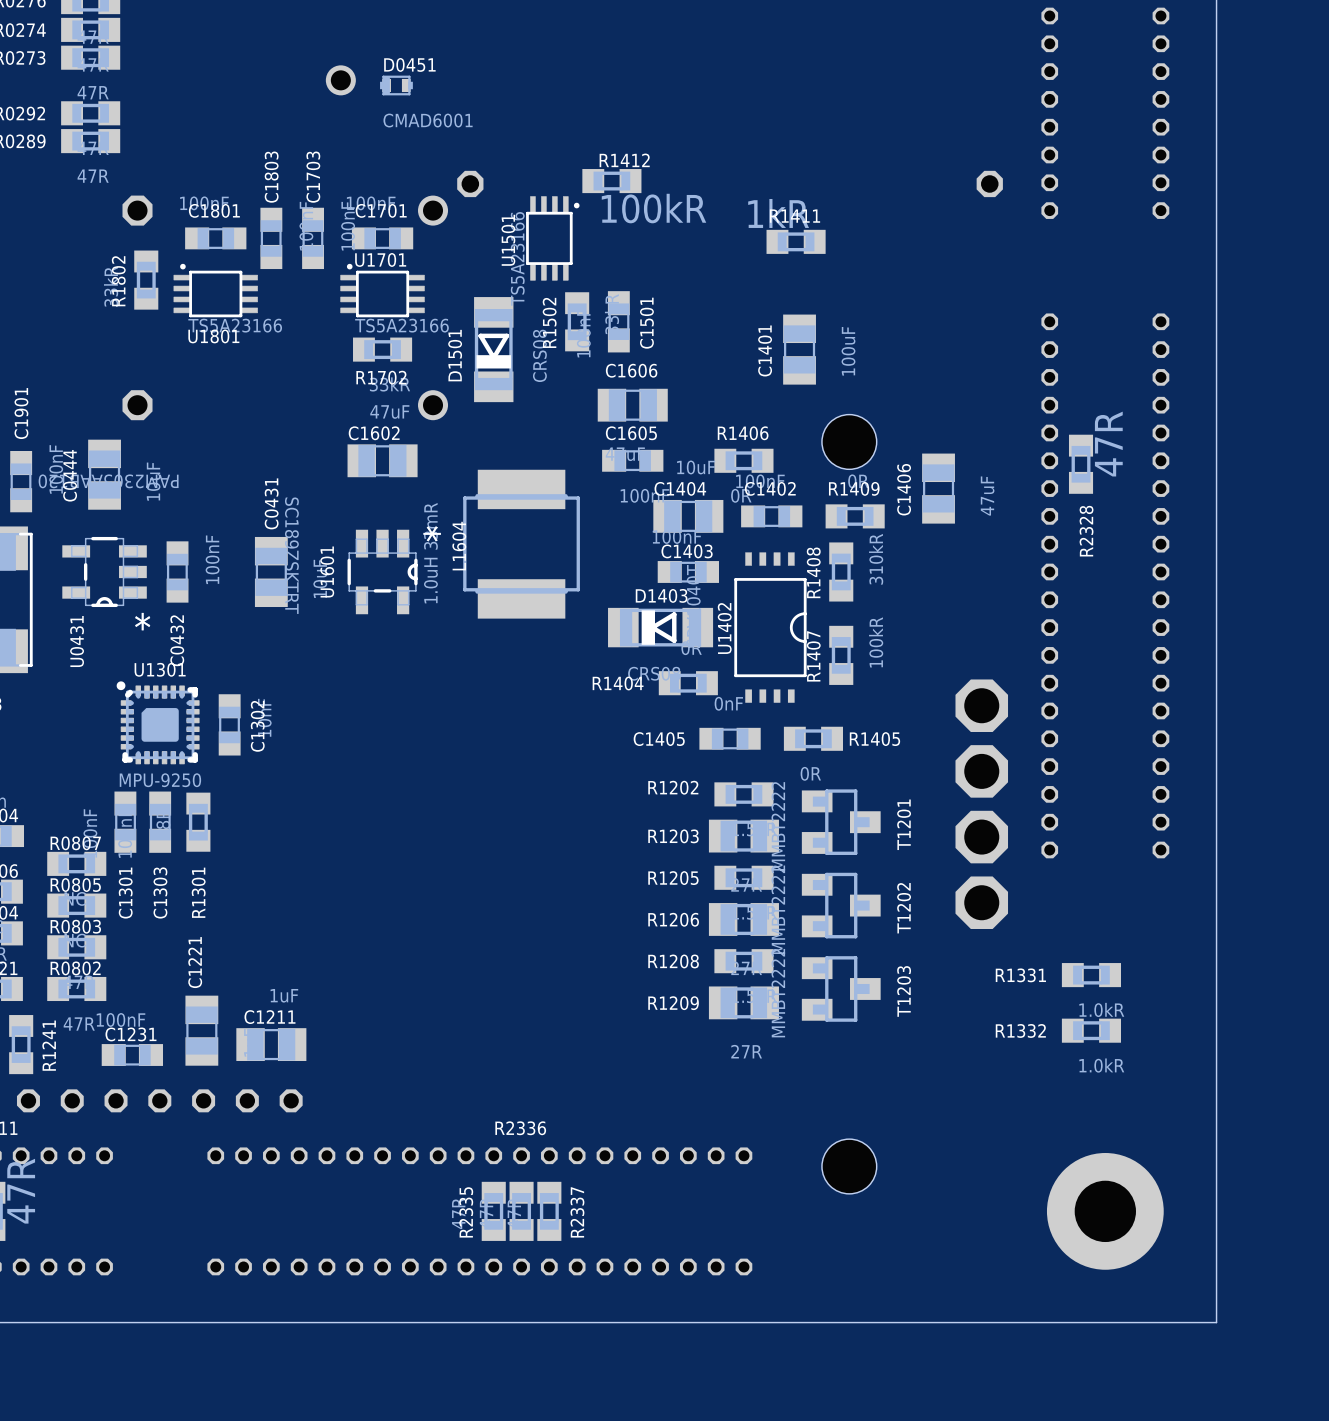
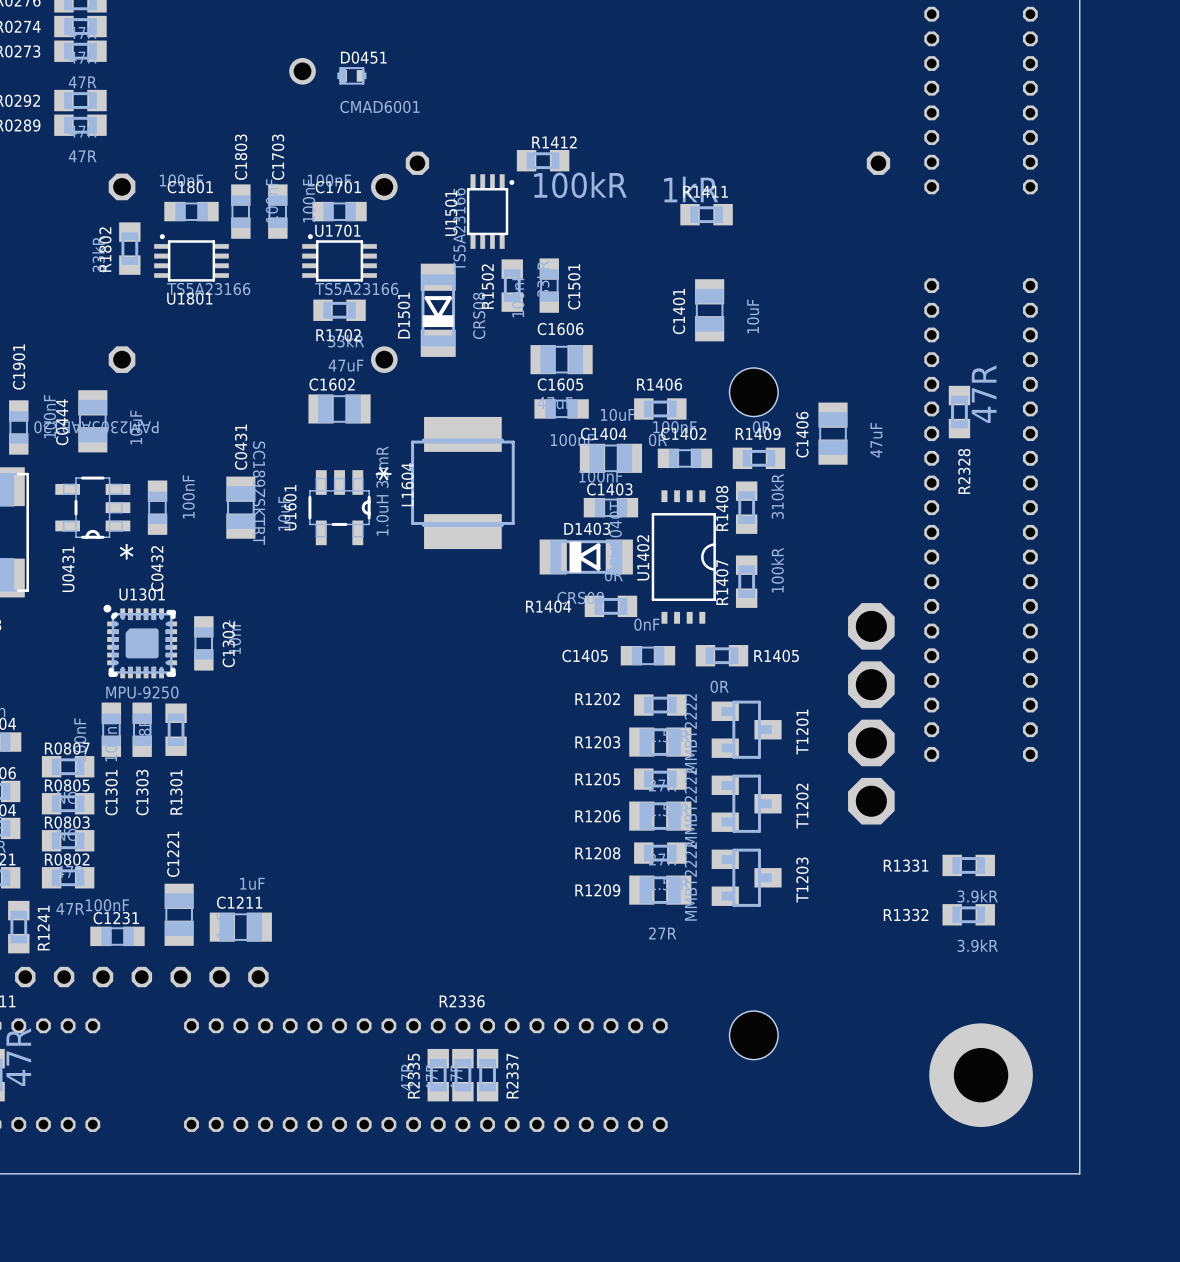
C1401 value: 100uF (848, 351) -> 10uF (753, 316)
R1331 value: 1.0kR (1101, 1009) -> 3.9kR (977, 896)
R1332 value: 1.0kR (1101, 1065) -> 3.9kR (977, 945)

